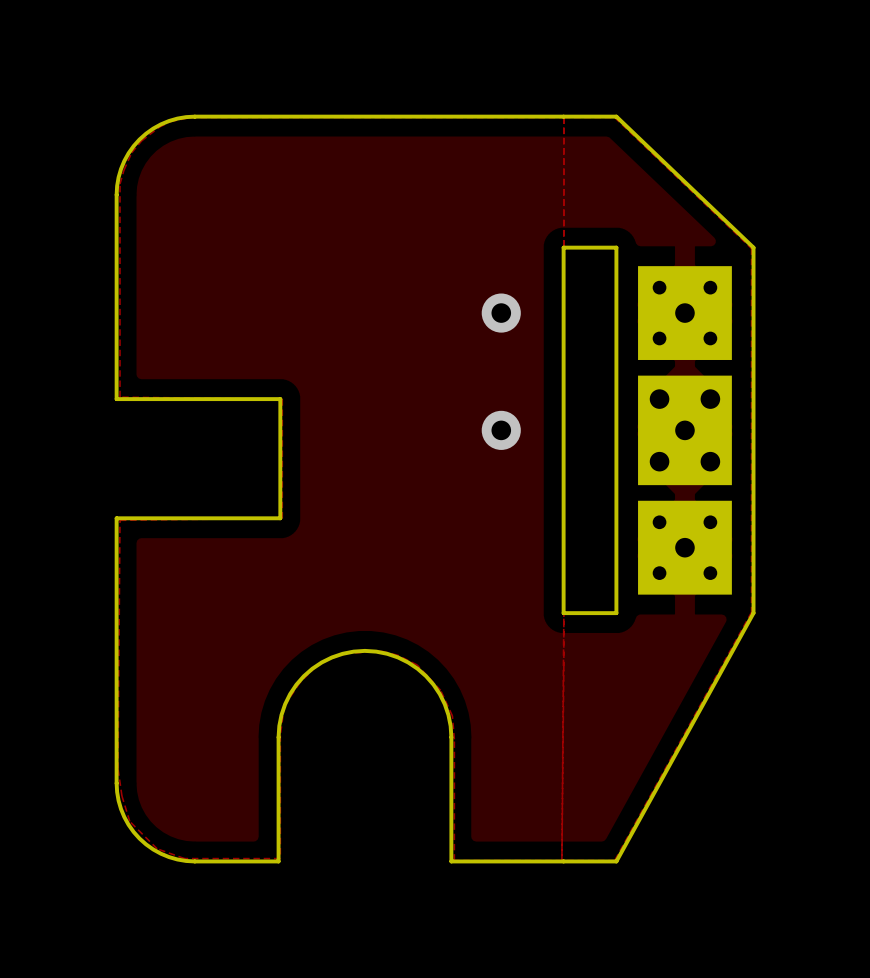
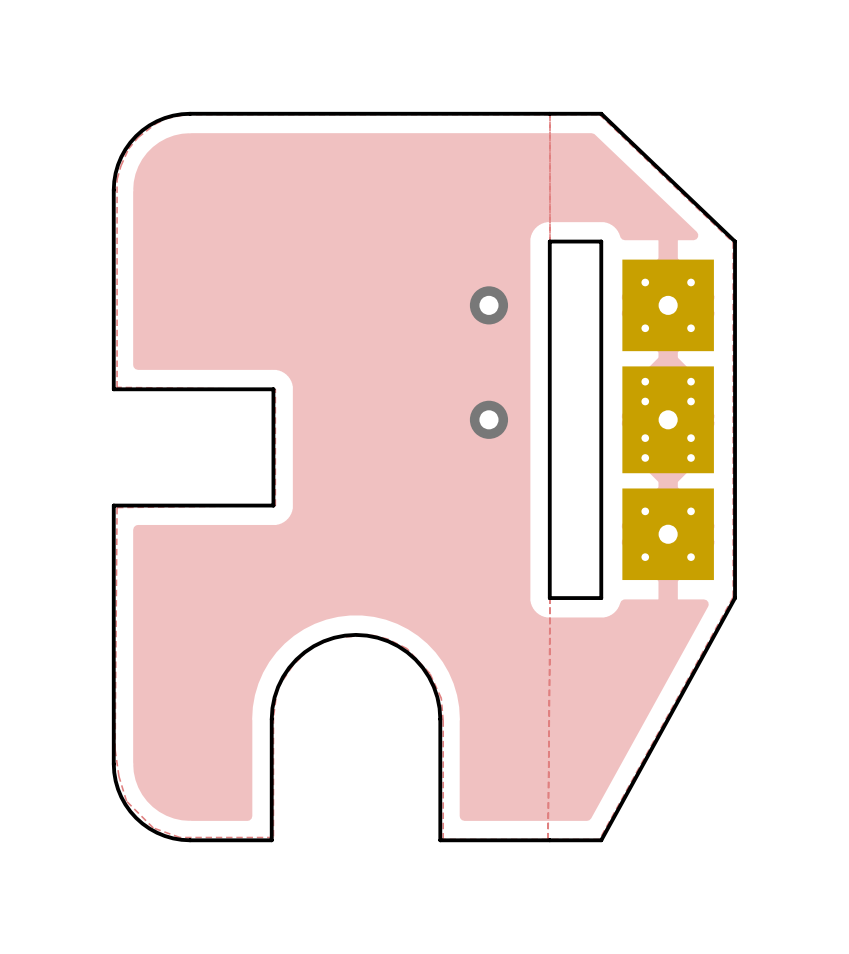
part footprint: [638, 266, 732, 360] -> [622, 259, 714, 352]
part footprint: [638, 375, 732, 486] -> [622, 366, 714, 474]
part footprint: [638, 500, 732, 595] -> [622, 488, 714, 581]

